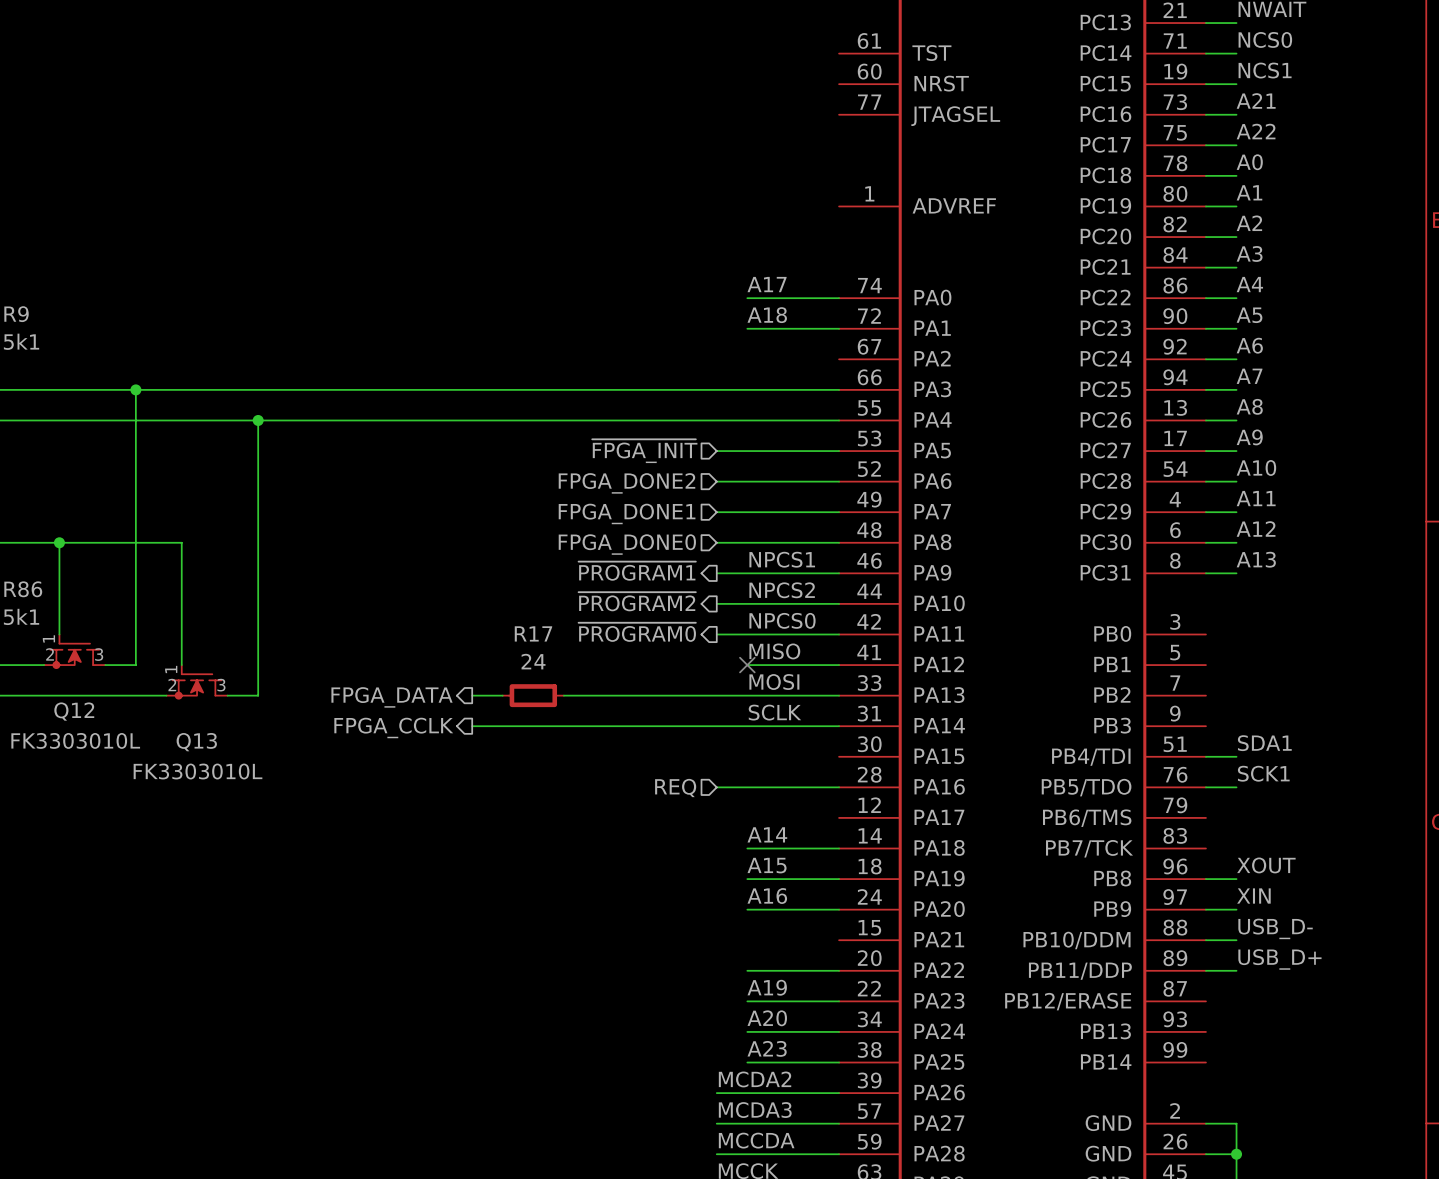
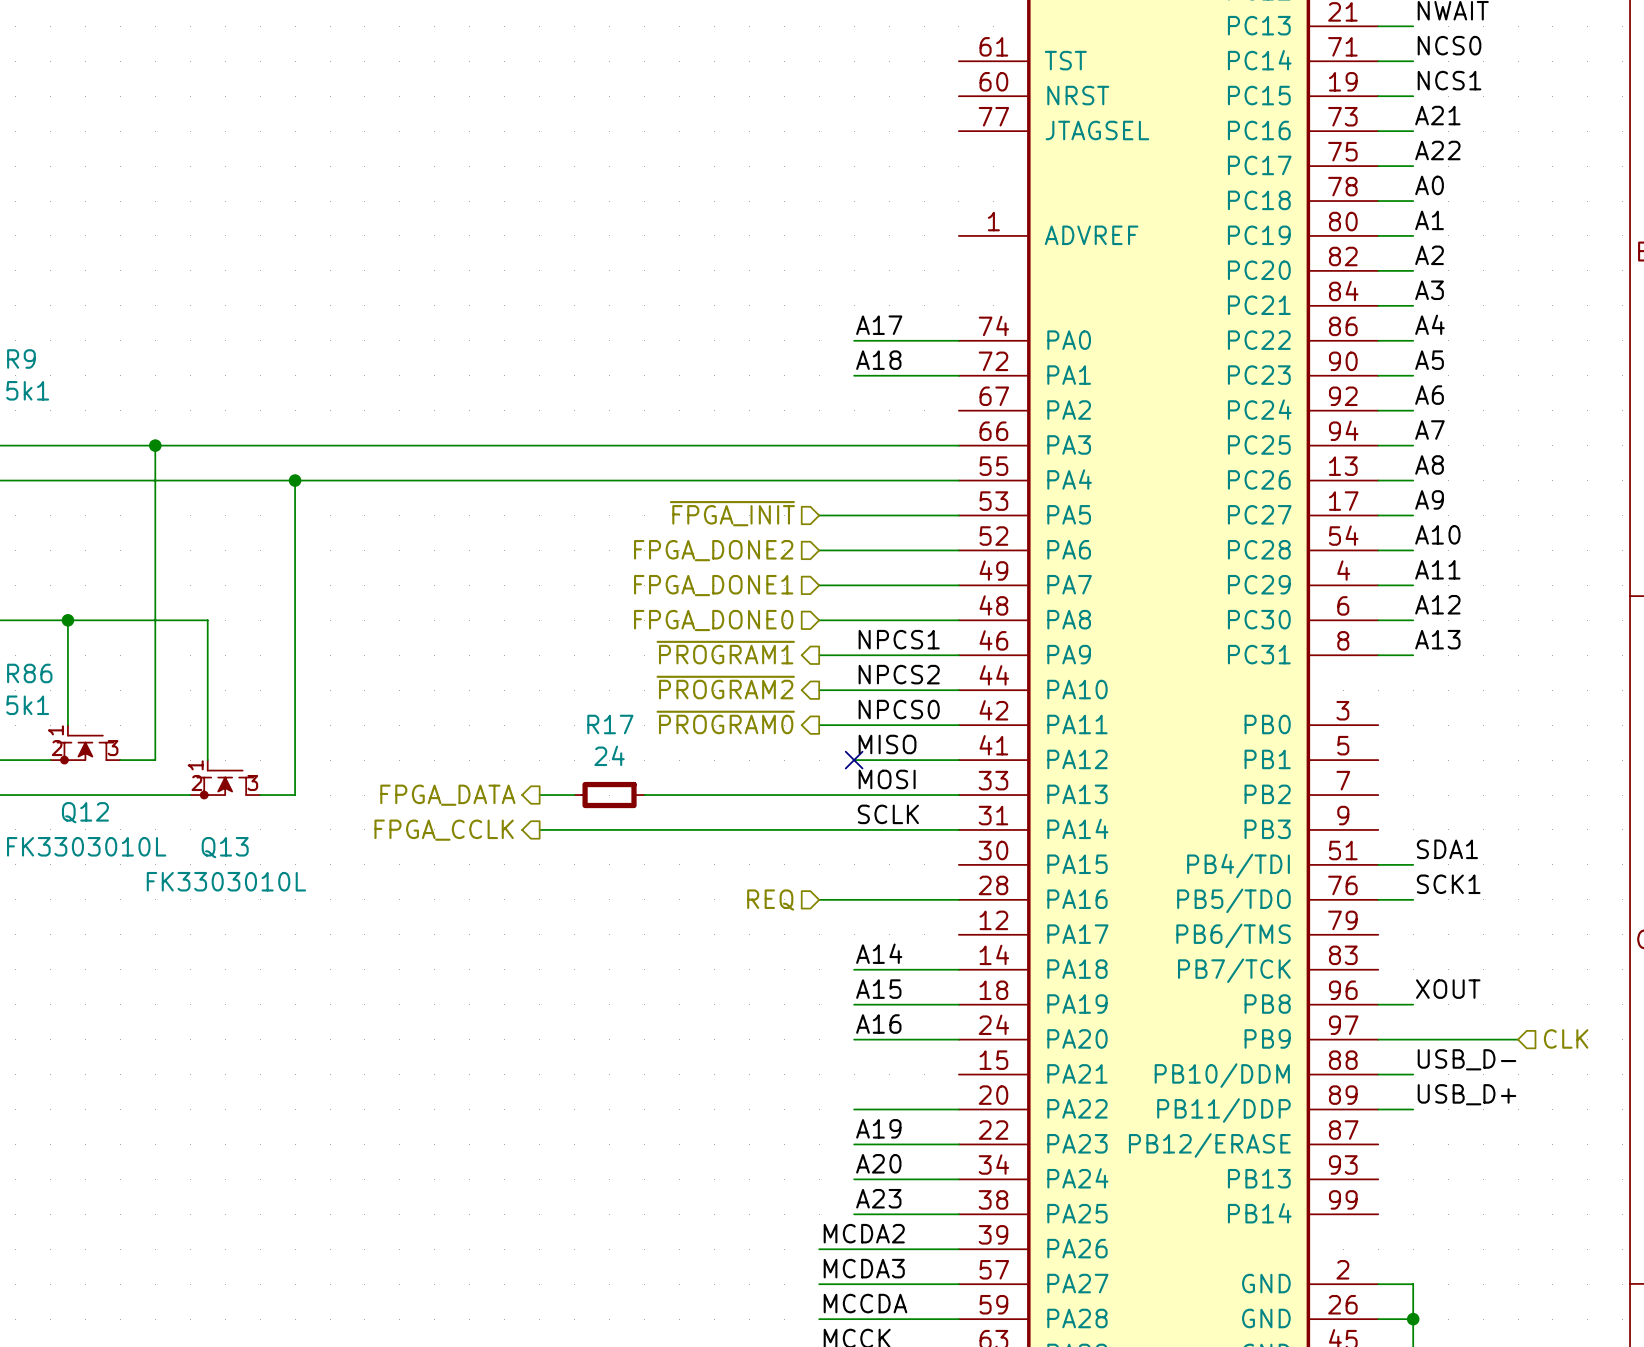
label: XIN (1253, 896) -> none
wire: none -> (1413, 1039) (1518, 1039)
hierarchical label: none -> CLK (1566, 1038)

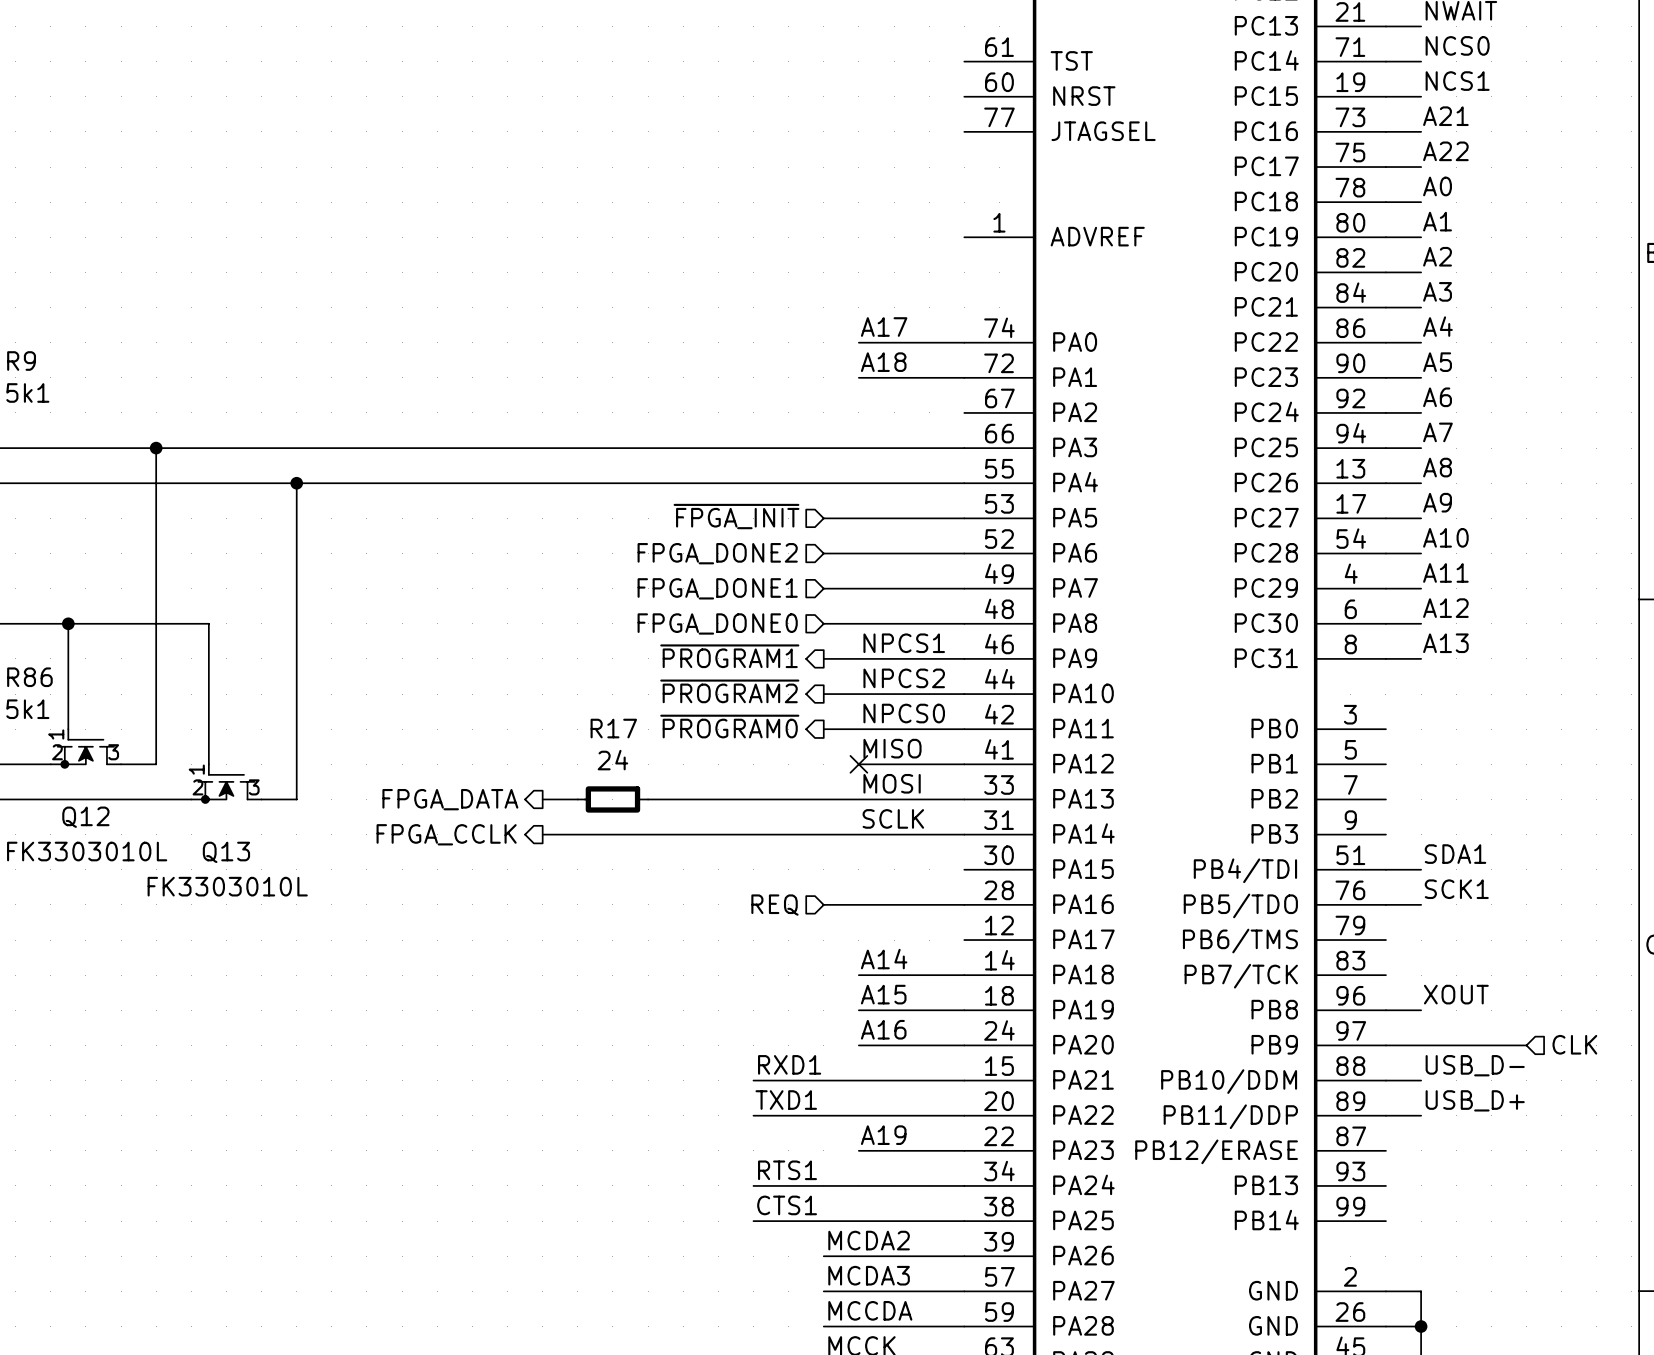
label: none -> RXD1 (789, 1064)
wire: none -> (753, 1080) (964, 1080)
label: none -> TXD1 (786, 1100)
wire: none -> (753, 1115) (858, 1115)
label: none -> RTS1 (787, 1170)
label: A20 (878, 1163) -> none
wire: none -> (753, 1185) (858, 1185)
label: none -> CTS1 (787, 1205)
label: A23 (878, 1198) -> none
wire: none -> (753, 1221) (858, 1221)

